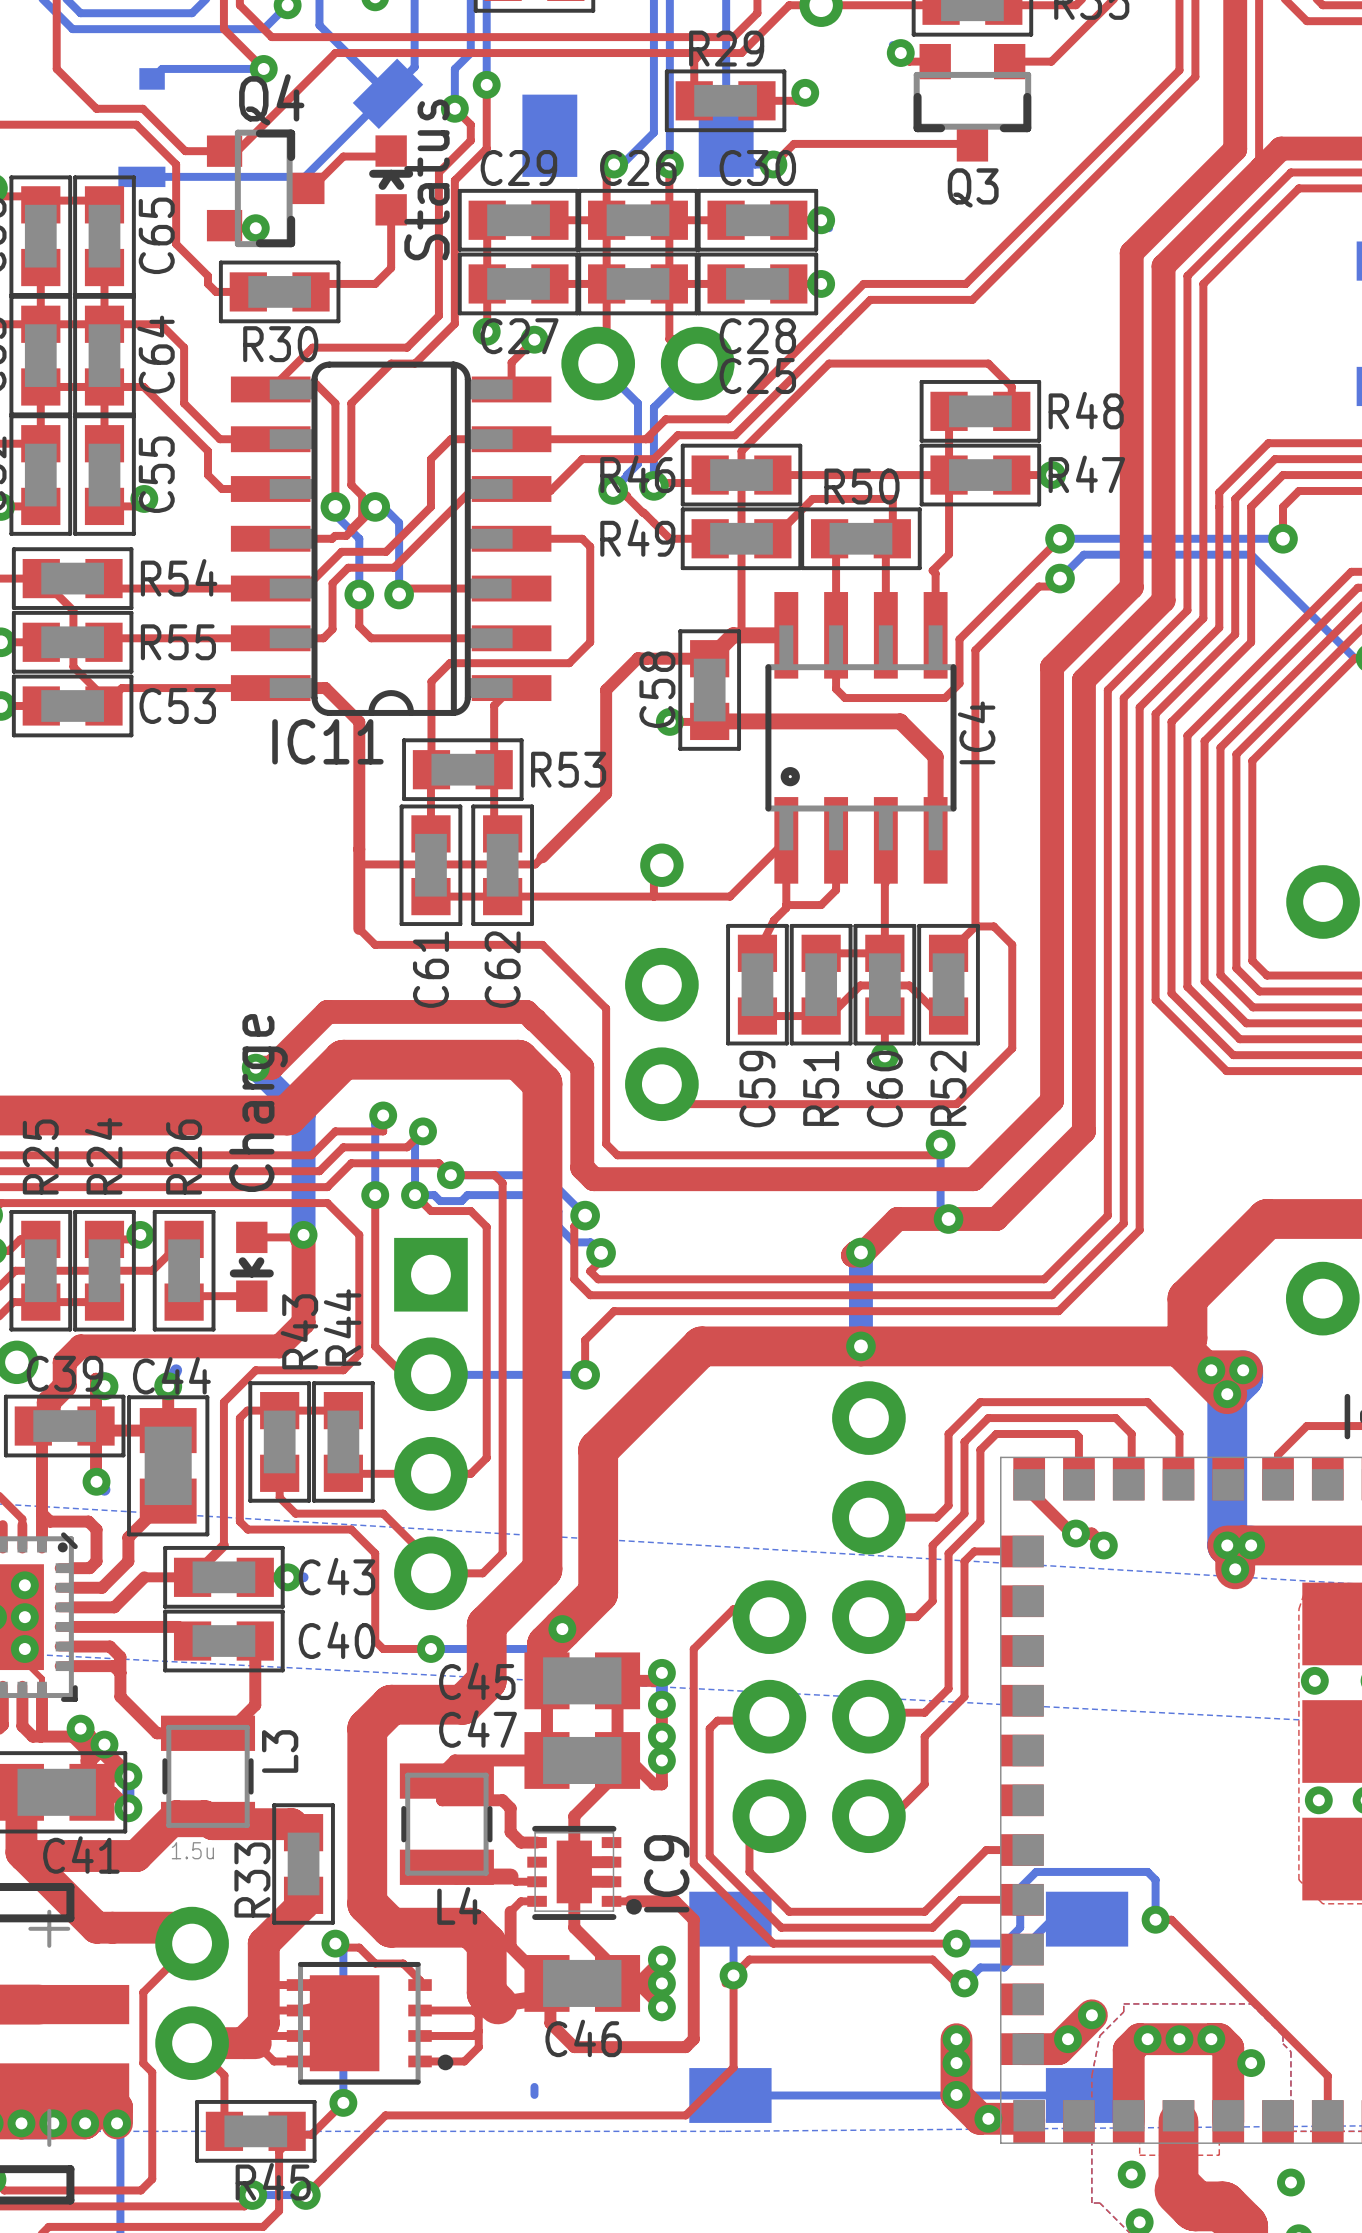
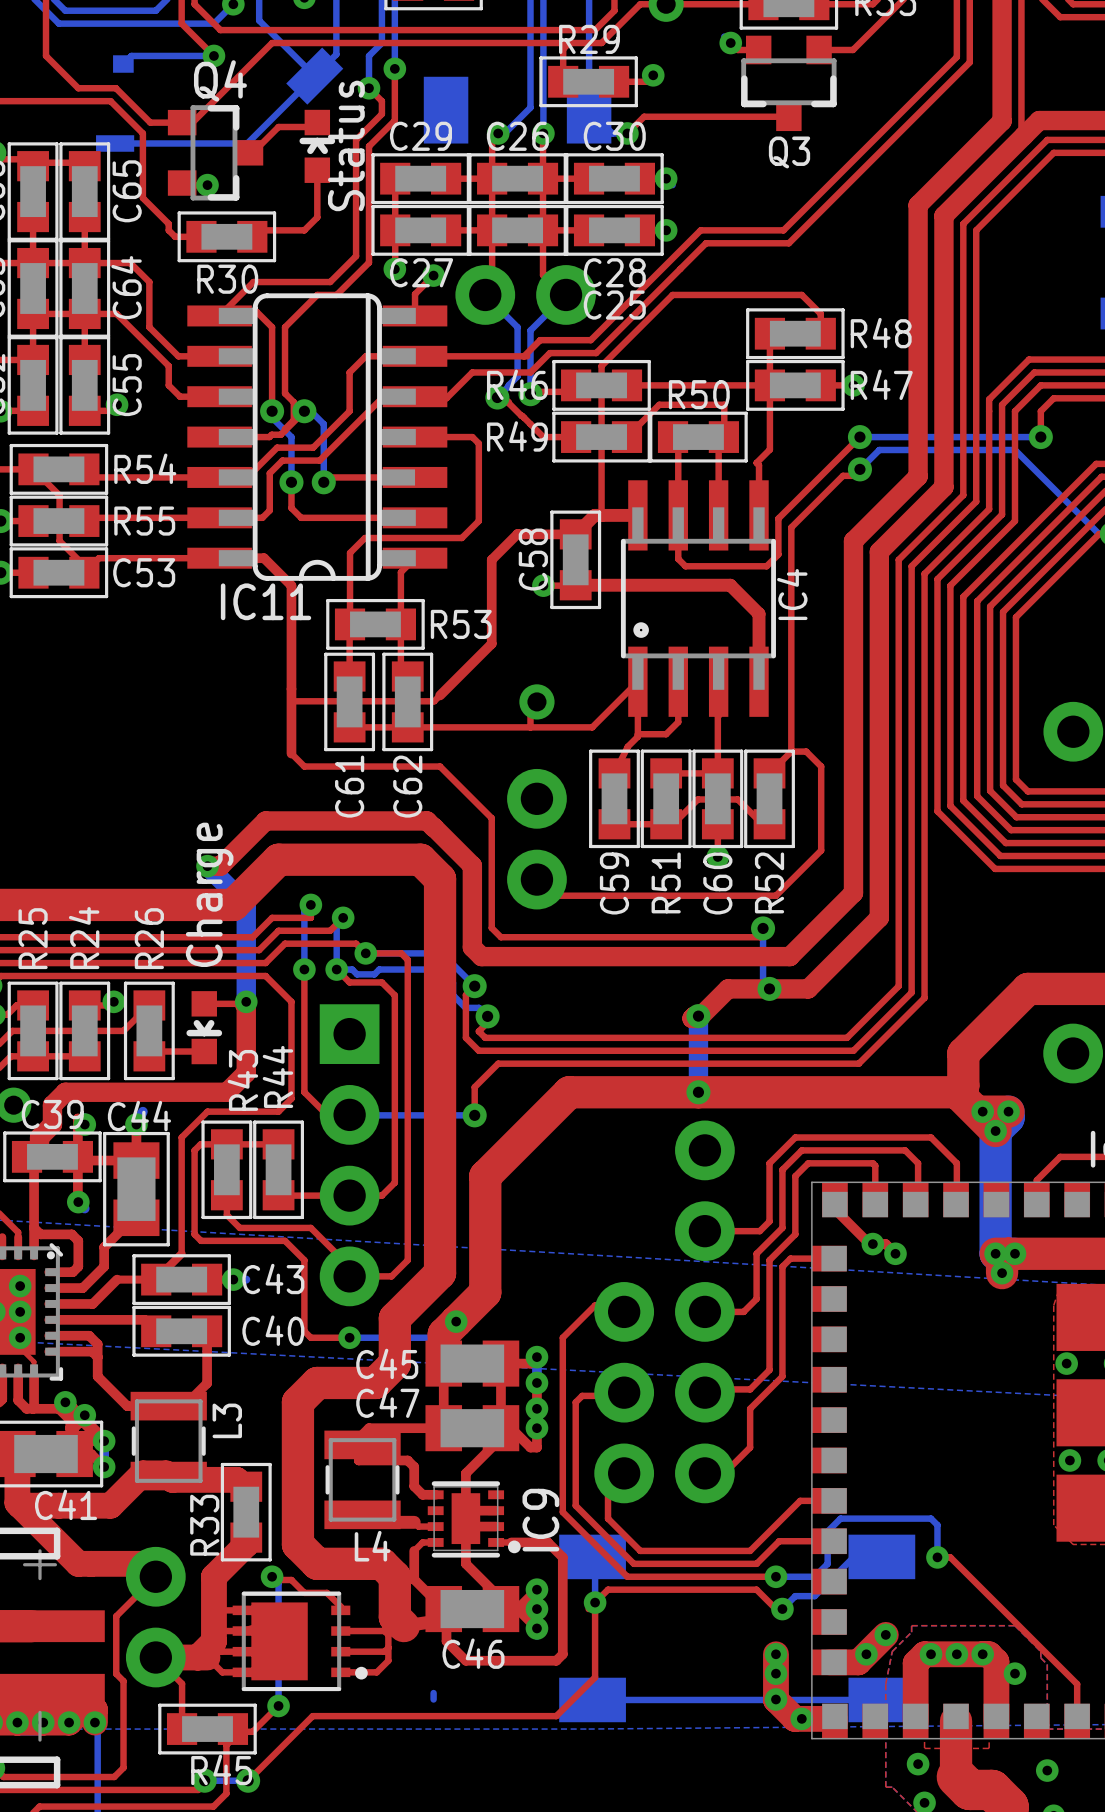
L3 value: 1.5u (192, 1850) -> none

